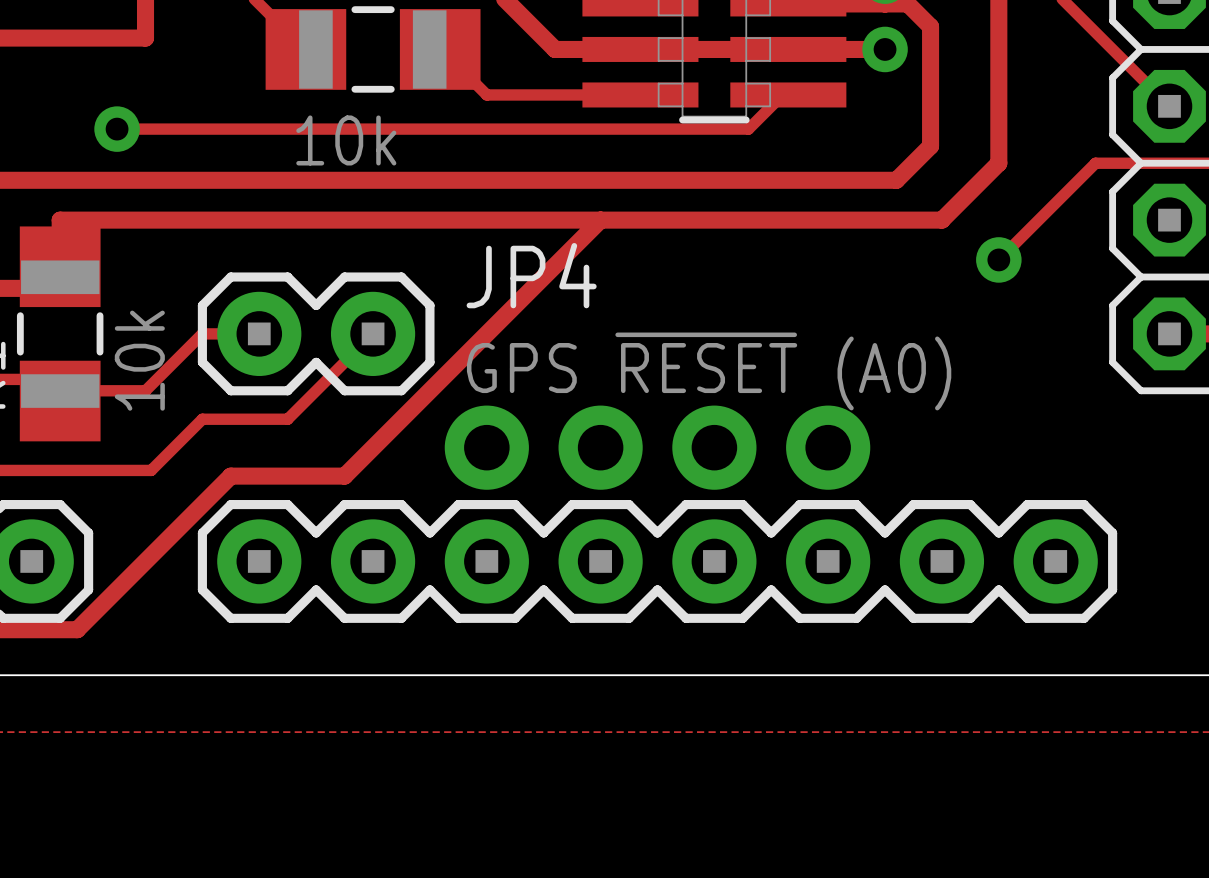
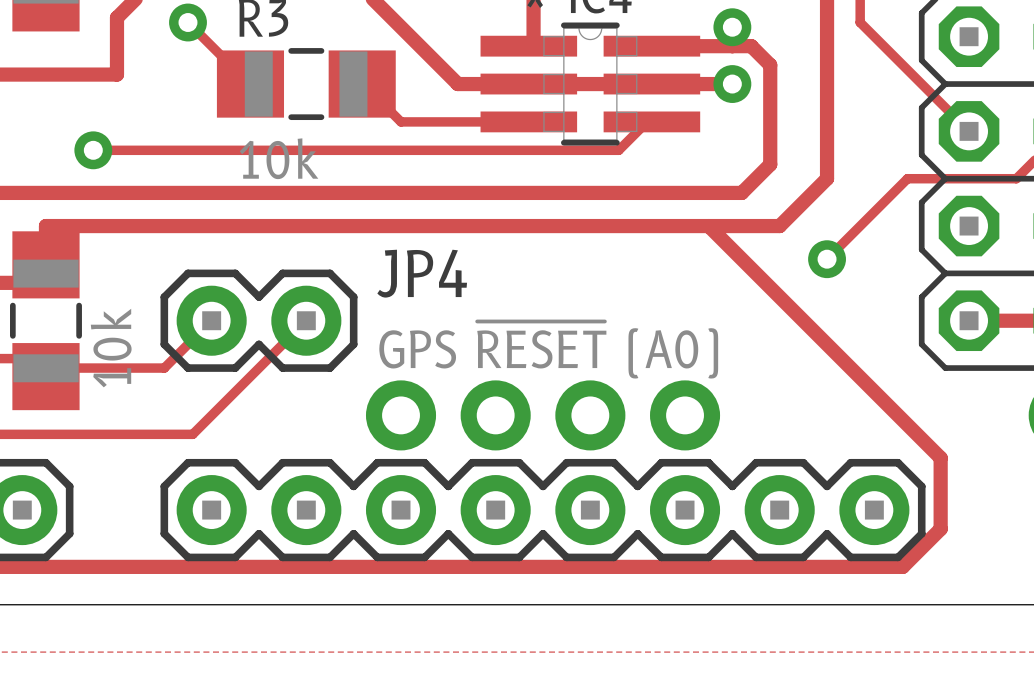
track: (600, 220) (344, 476) (230, 476) (77, 629) -> (708, 226) (940, 458) (940, 529) (902, 566) (60, 566)
track: (259, 333) (202, 333) (145, 390) -> (211, 320) (164, 368) (116, 368)
track: (287, 419) (202, 419) (151, 470) -> (235, 391) (192, 434) (121, 434)

